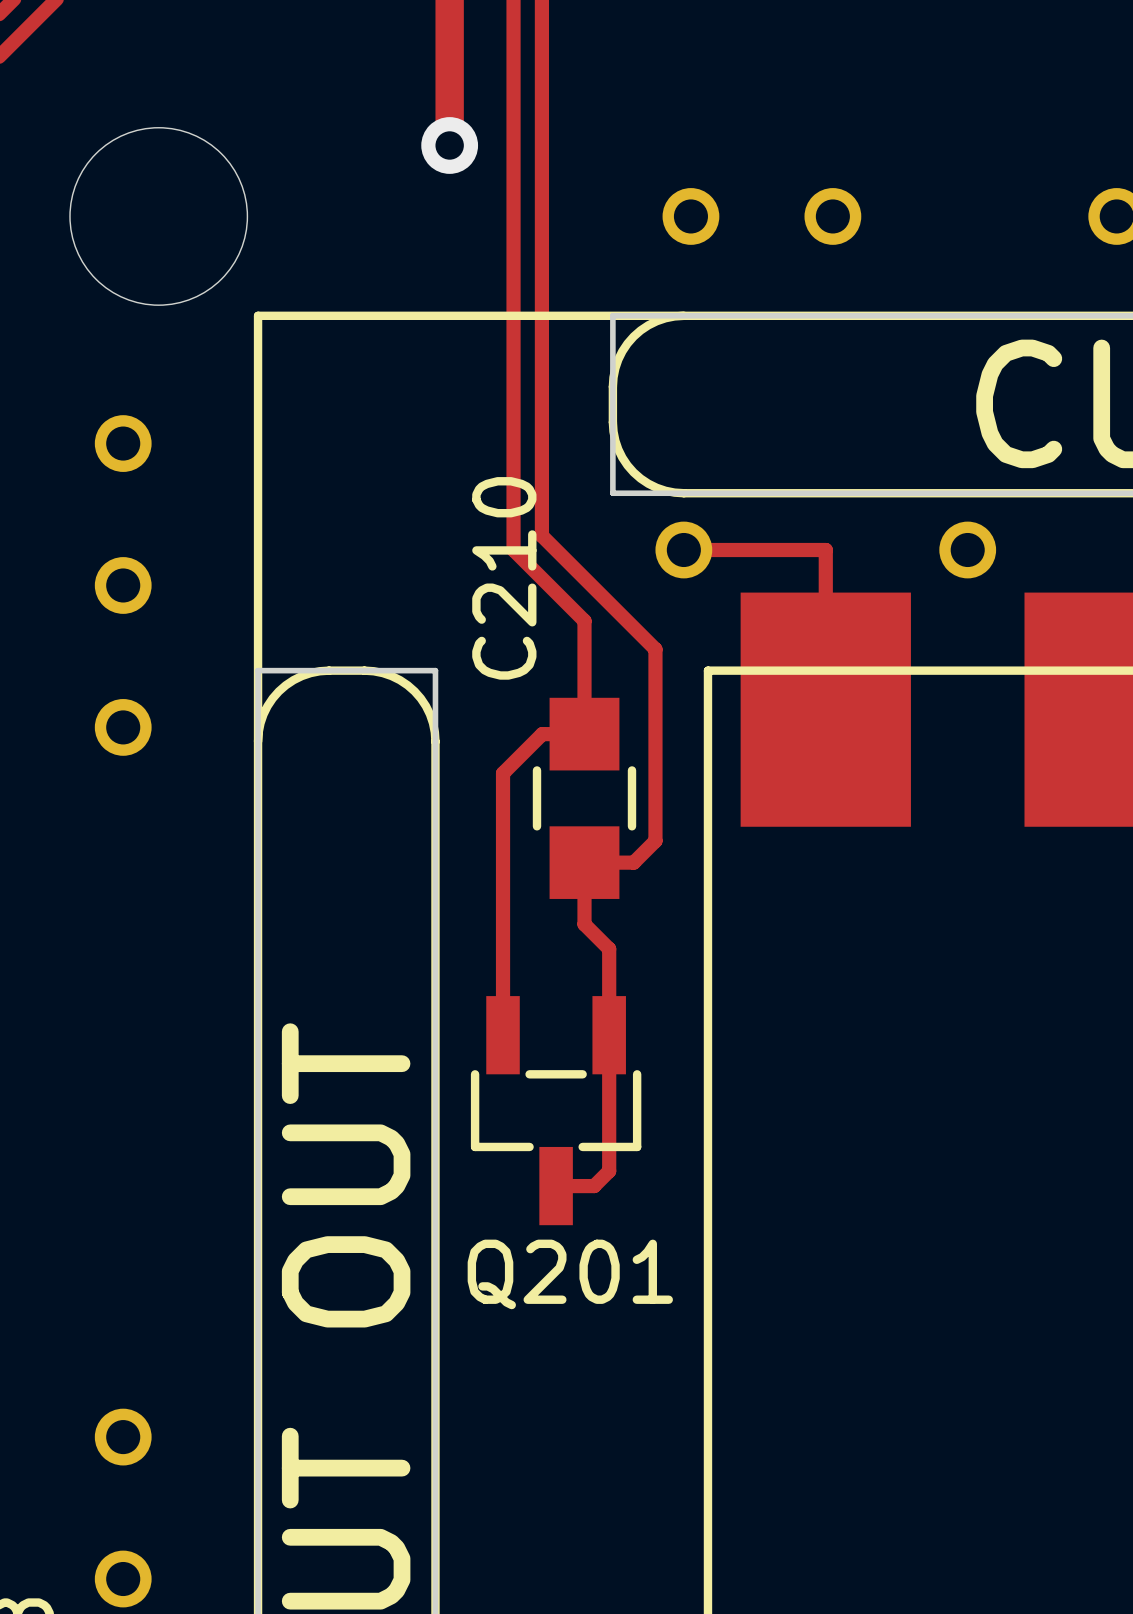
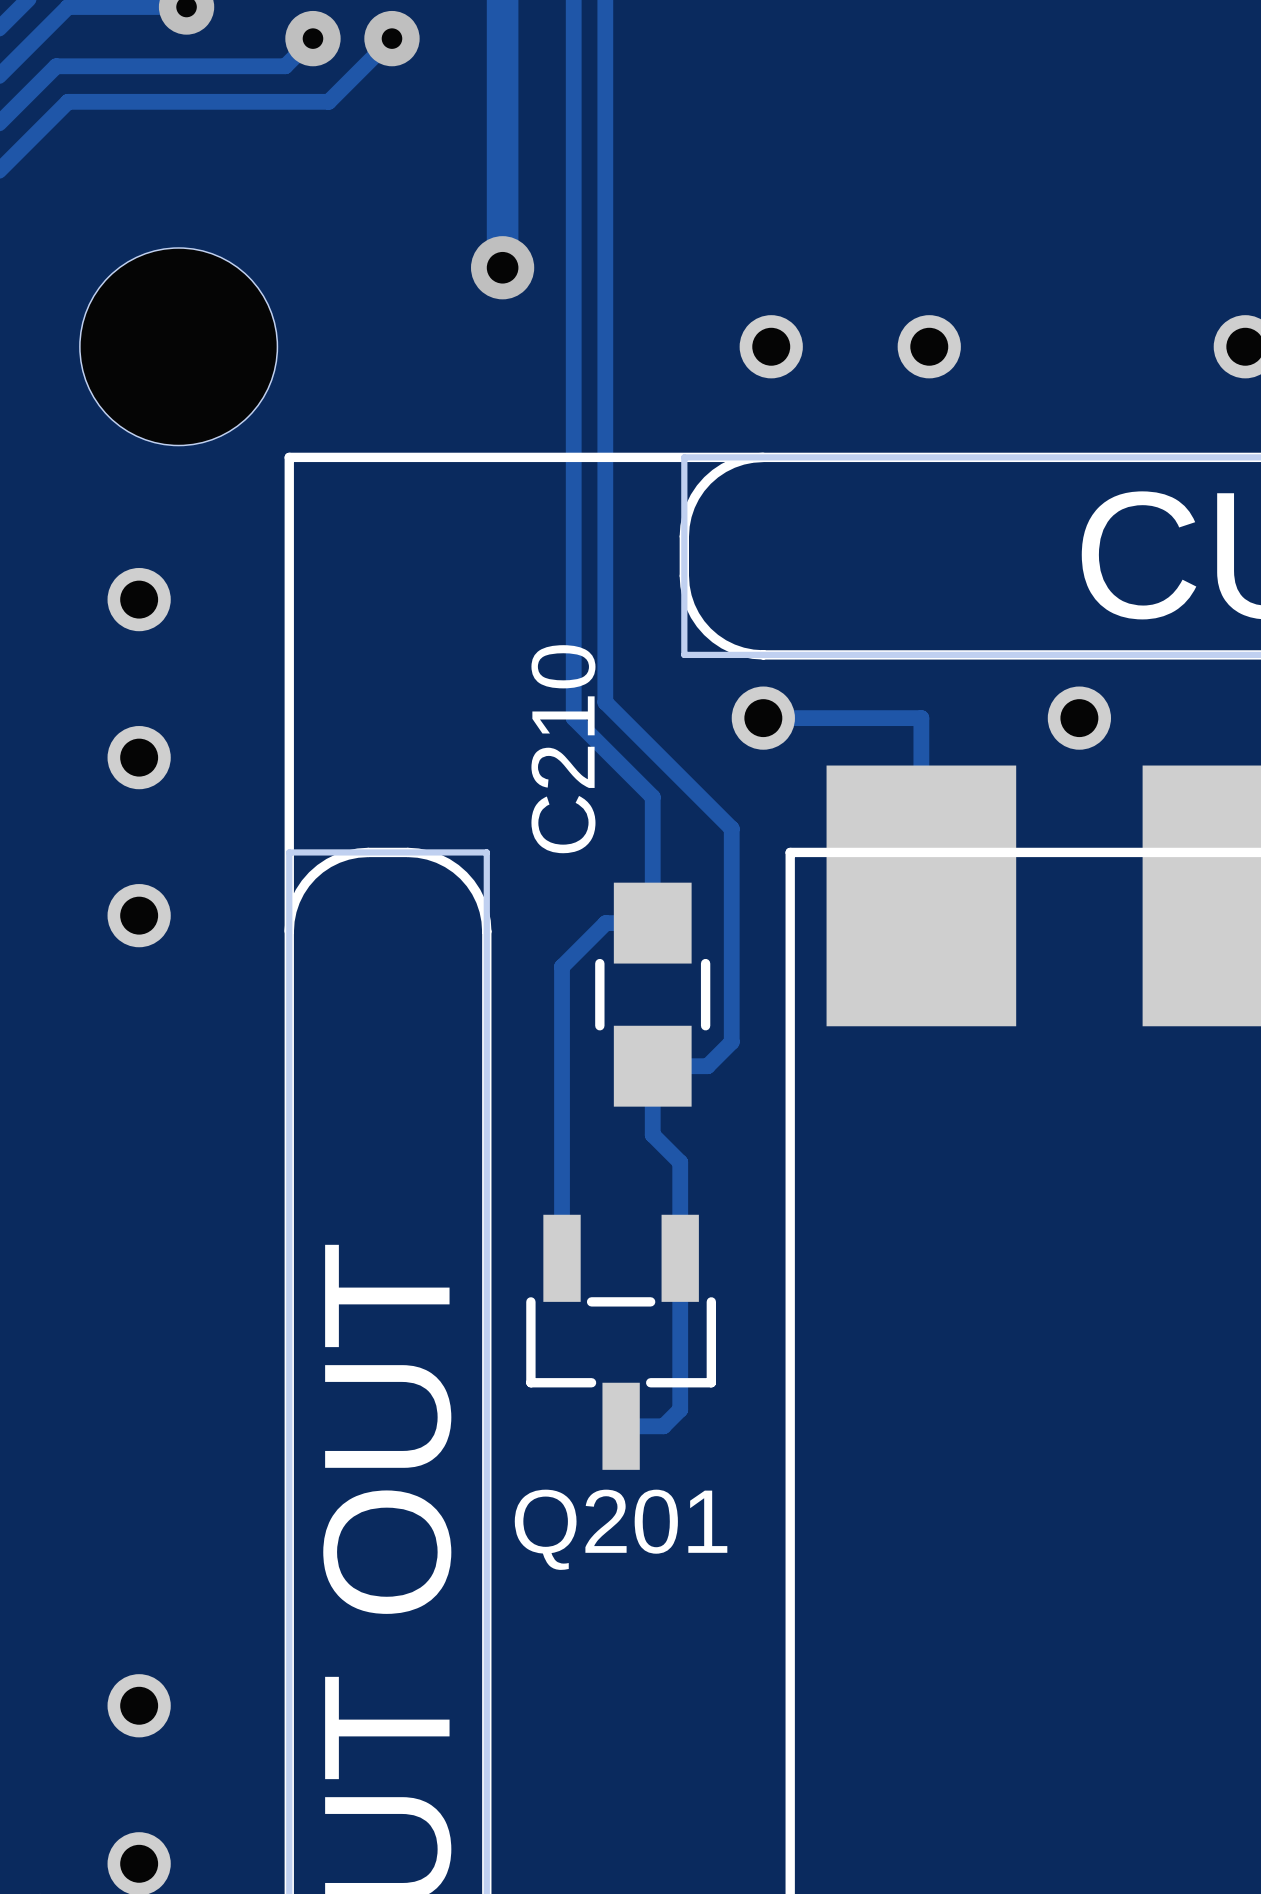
Q201 name position: Q201 (570, 1274) -> Q201 (621, 1529)

